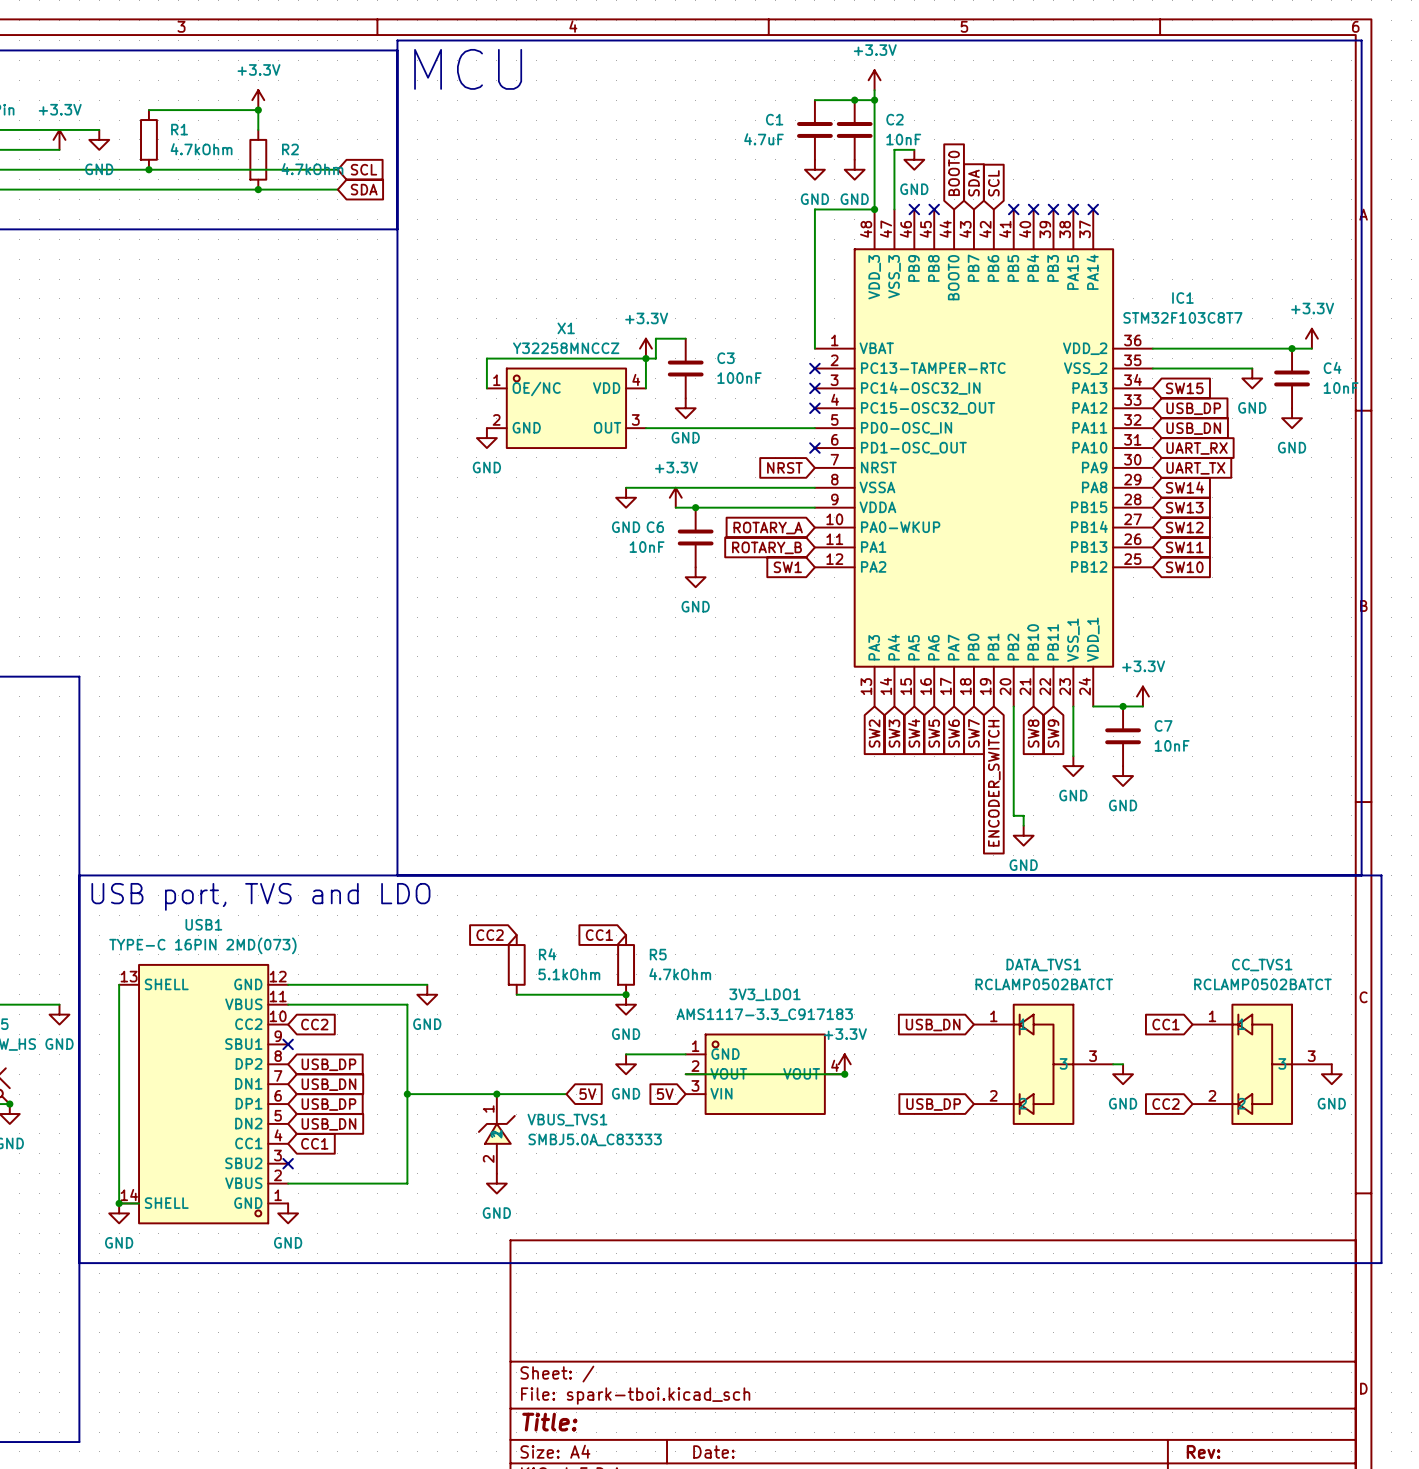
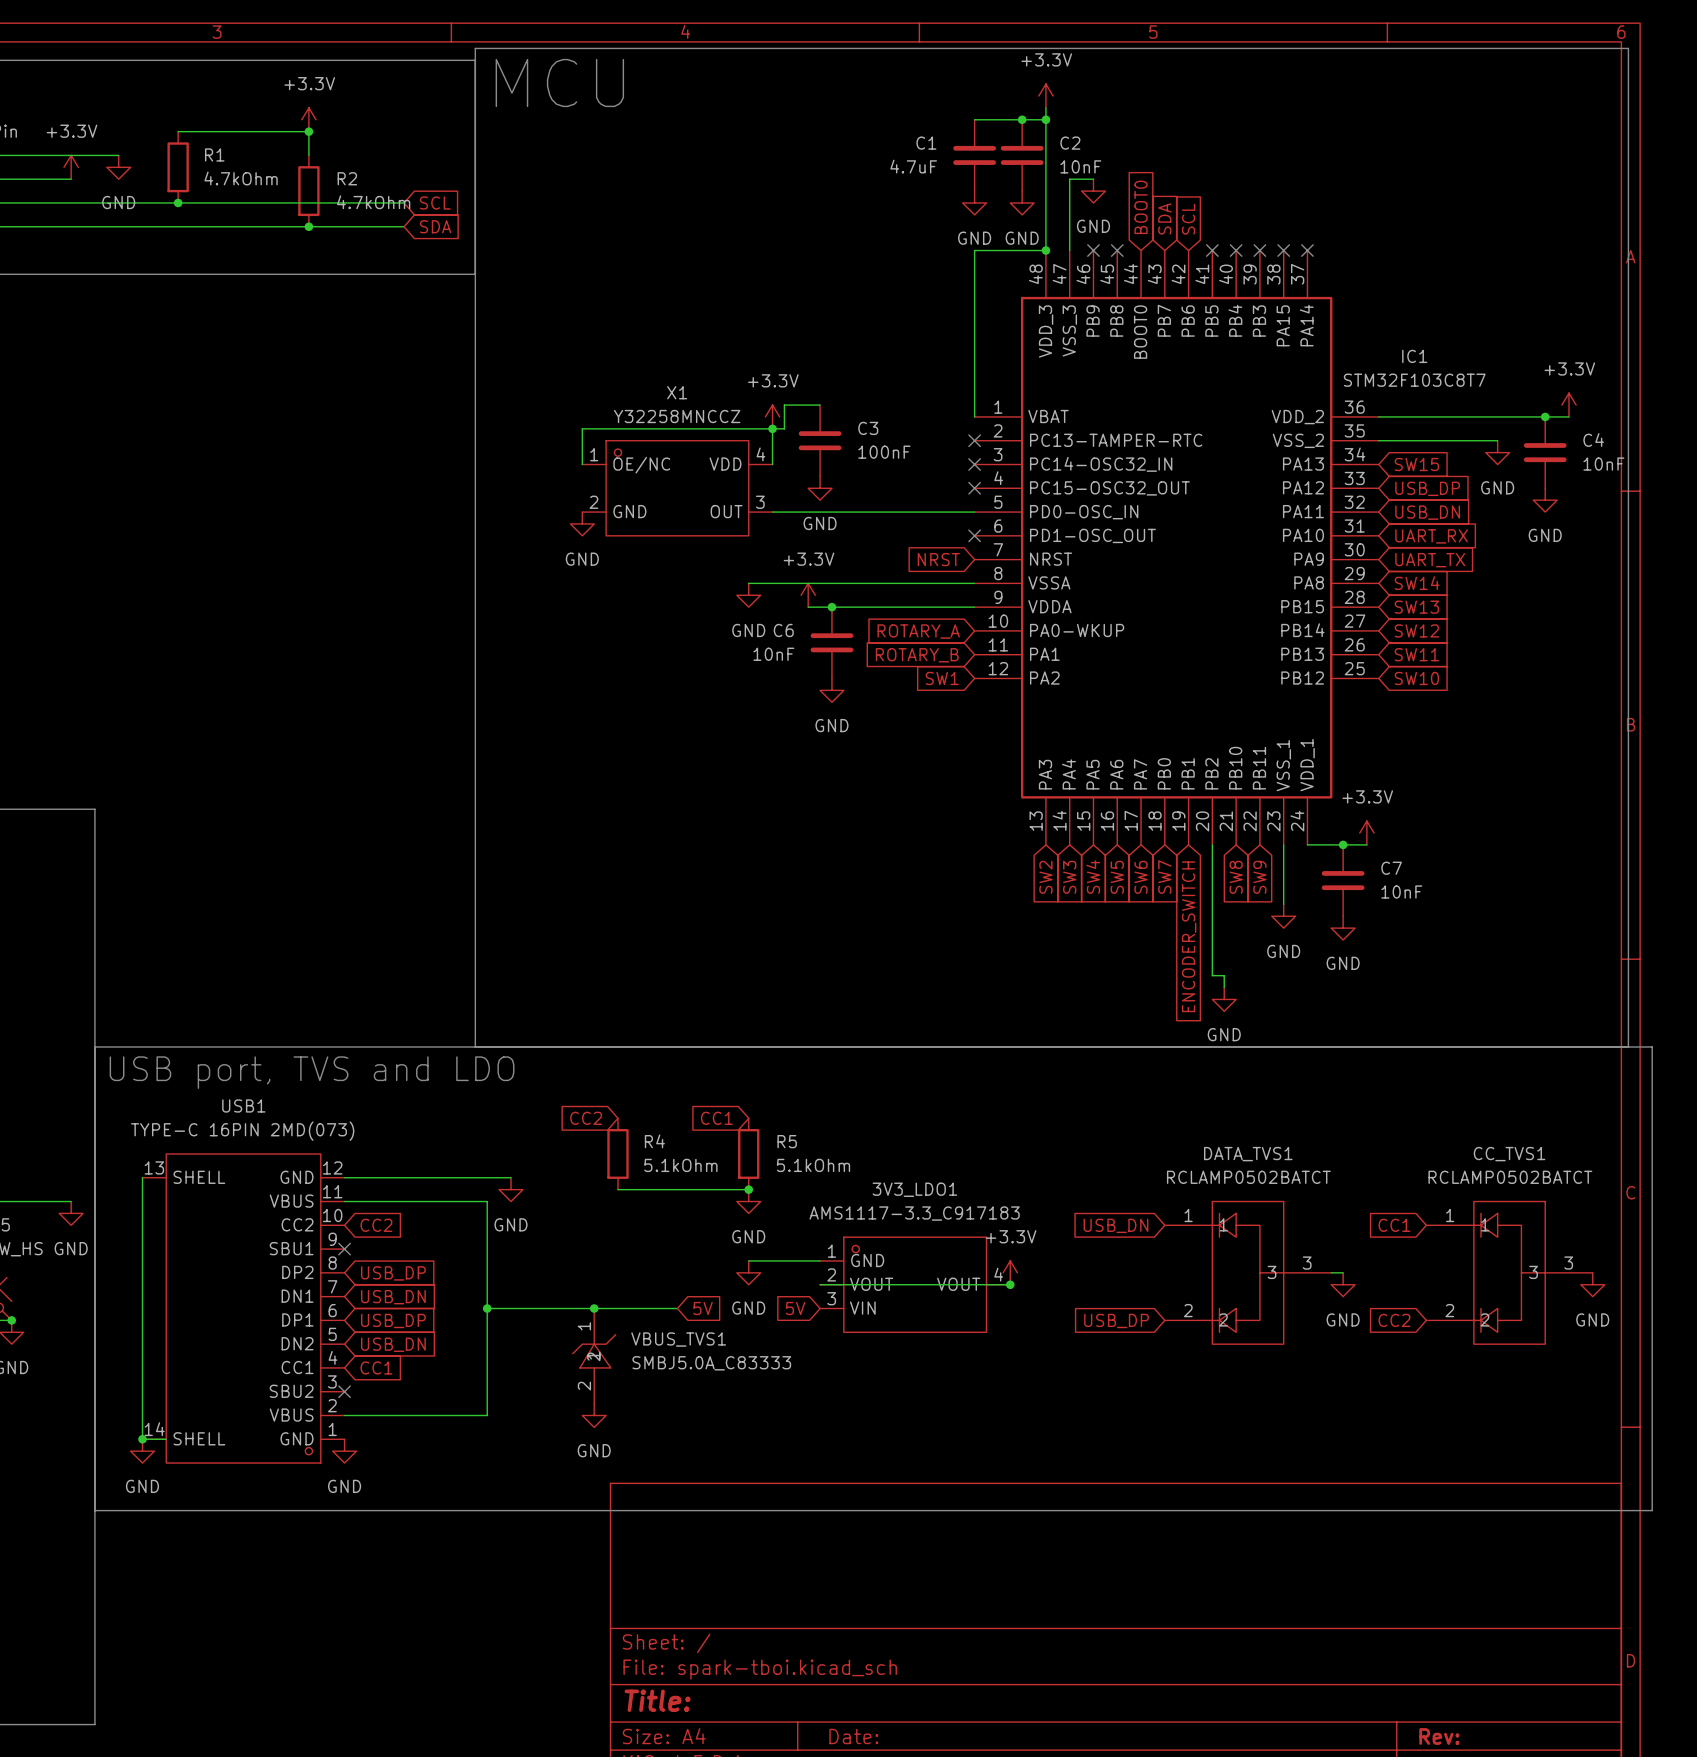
R5 value: 4.7kOhm (680, 974) -> 5.1kOhm (813, 1165)

